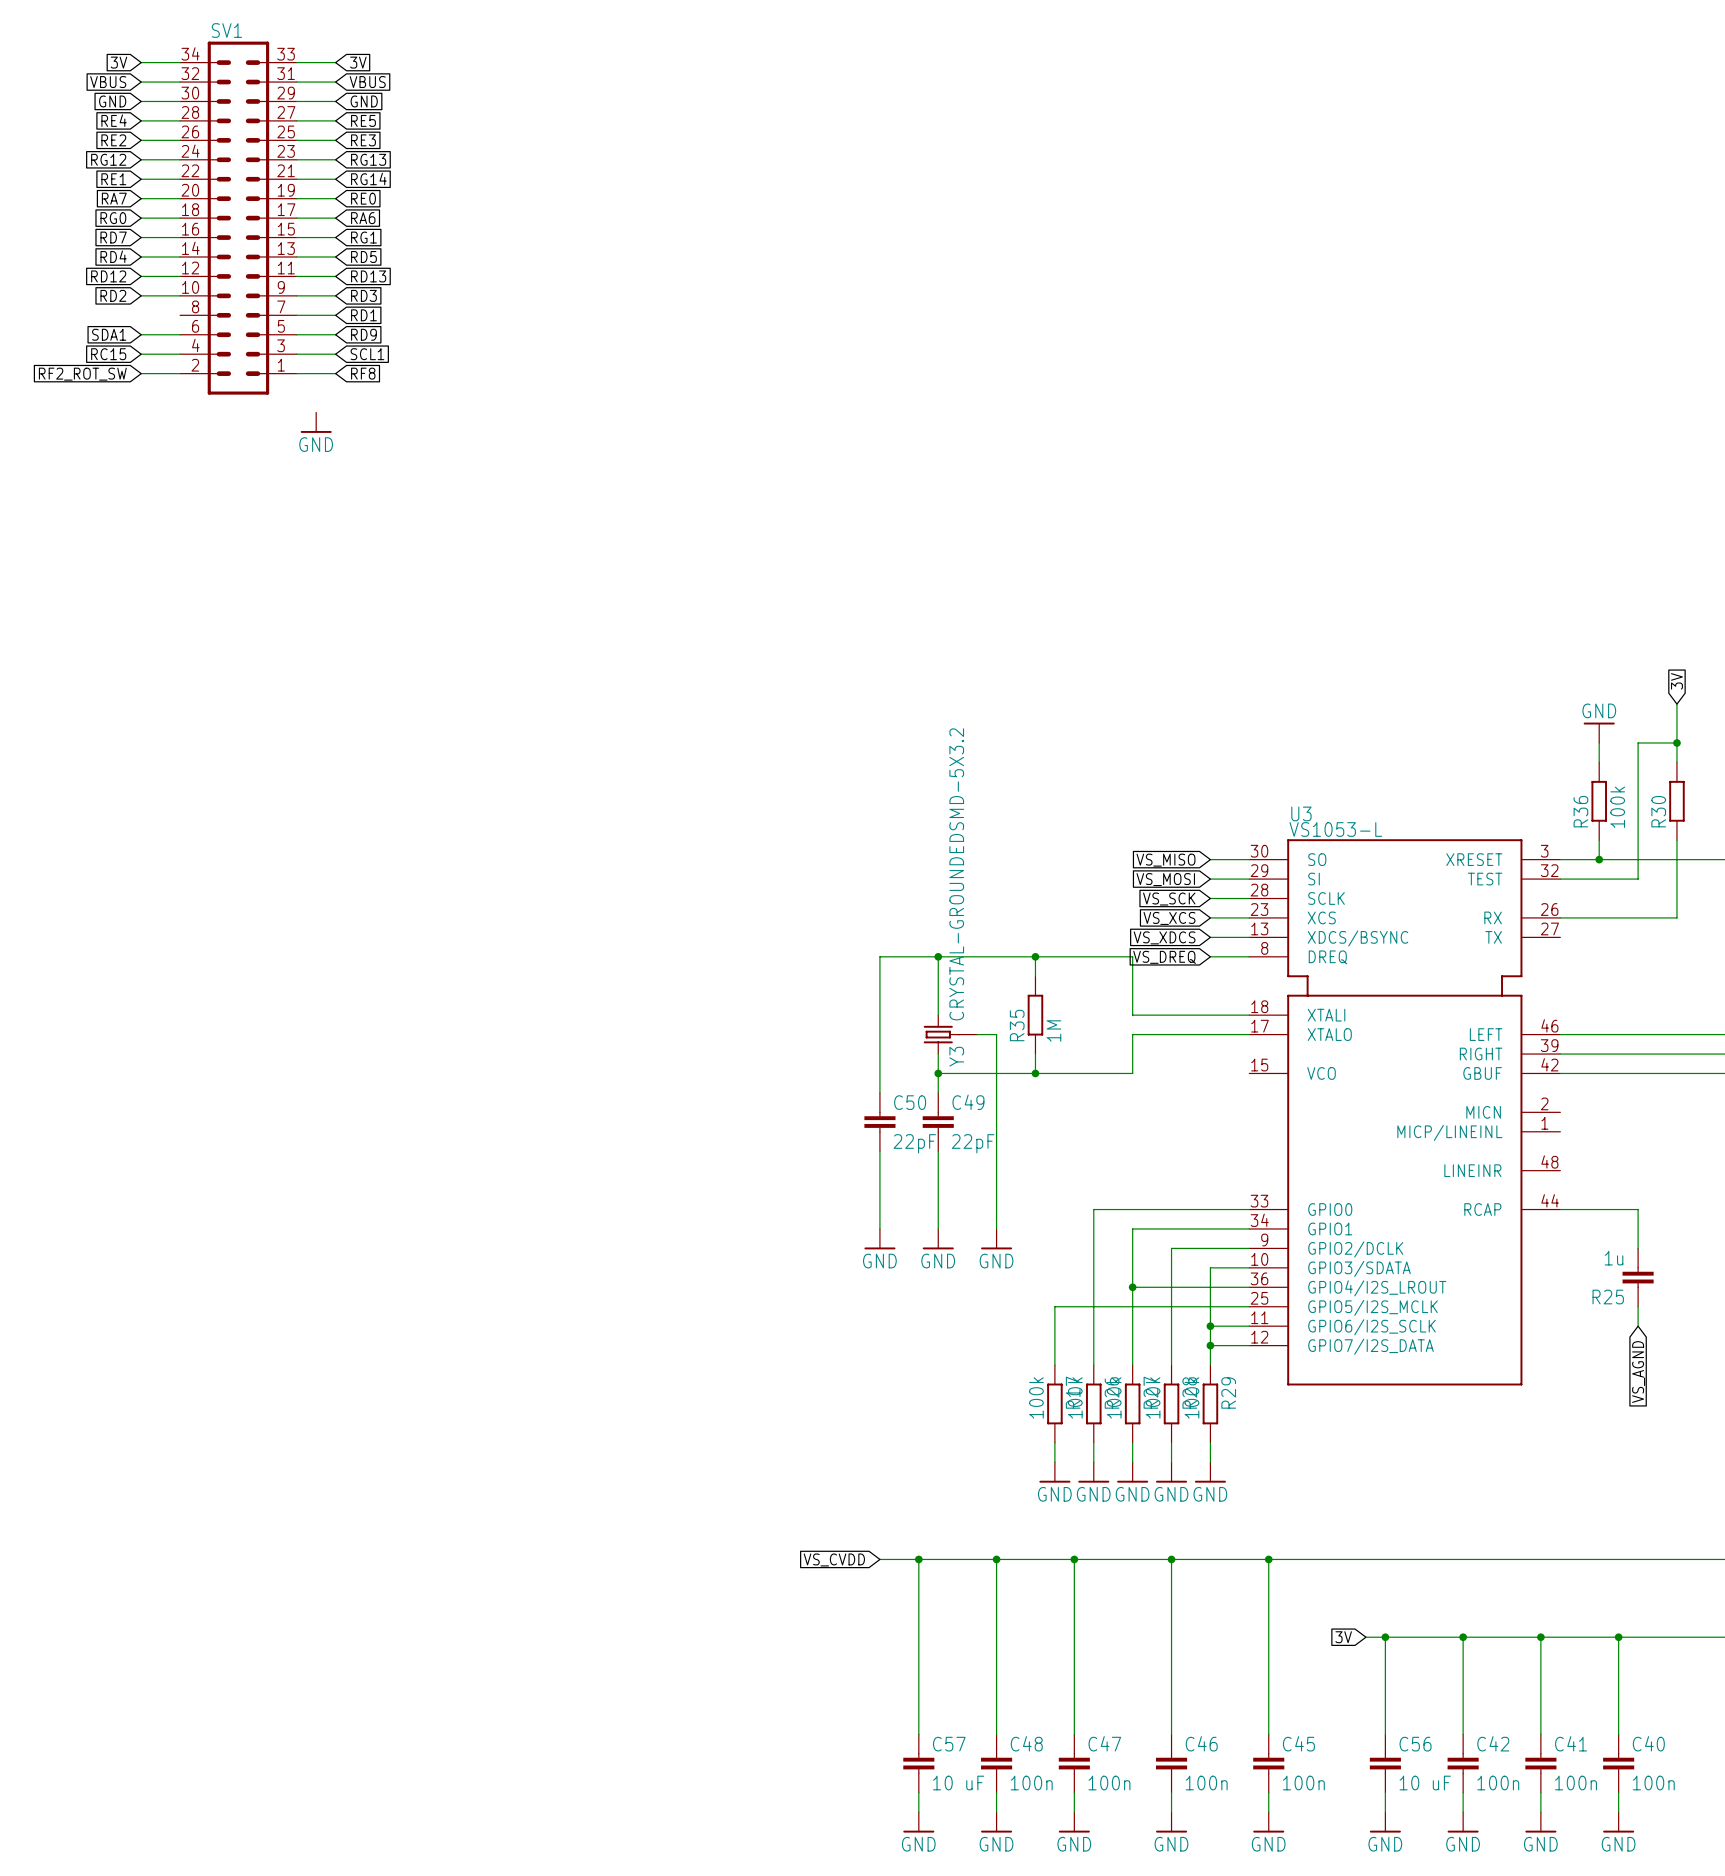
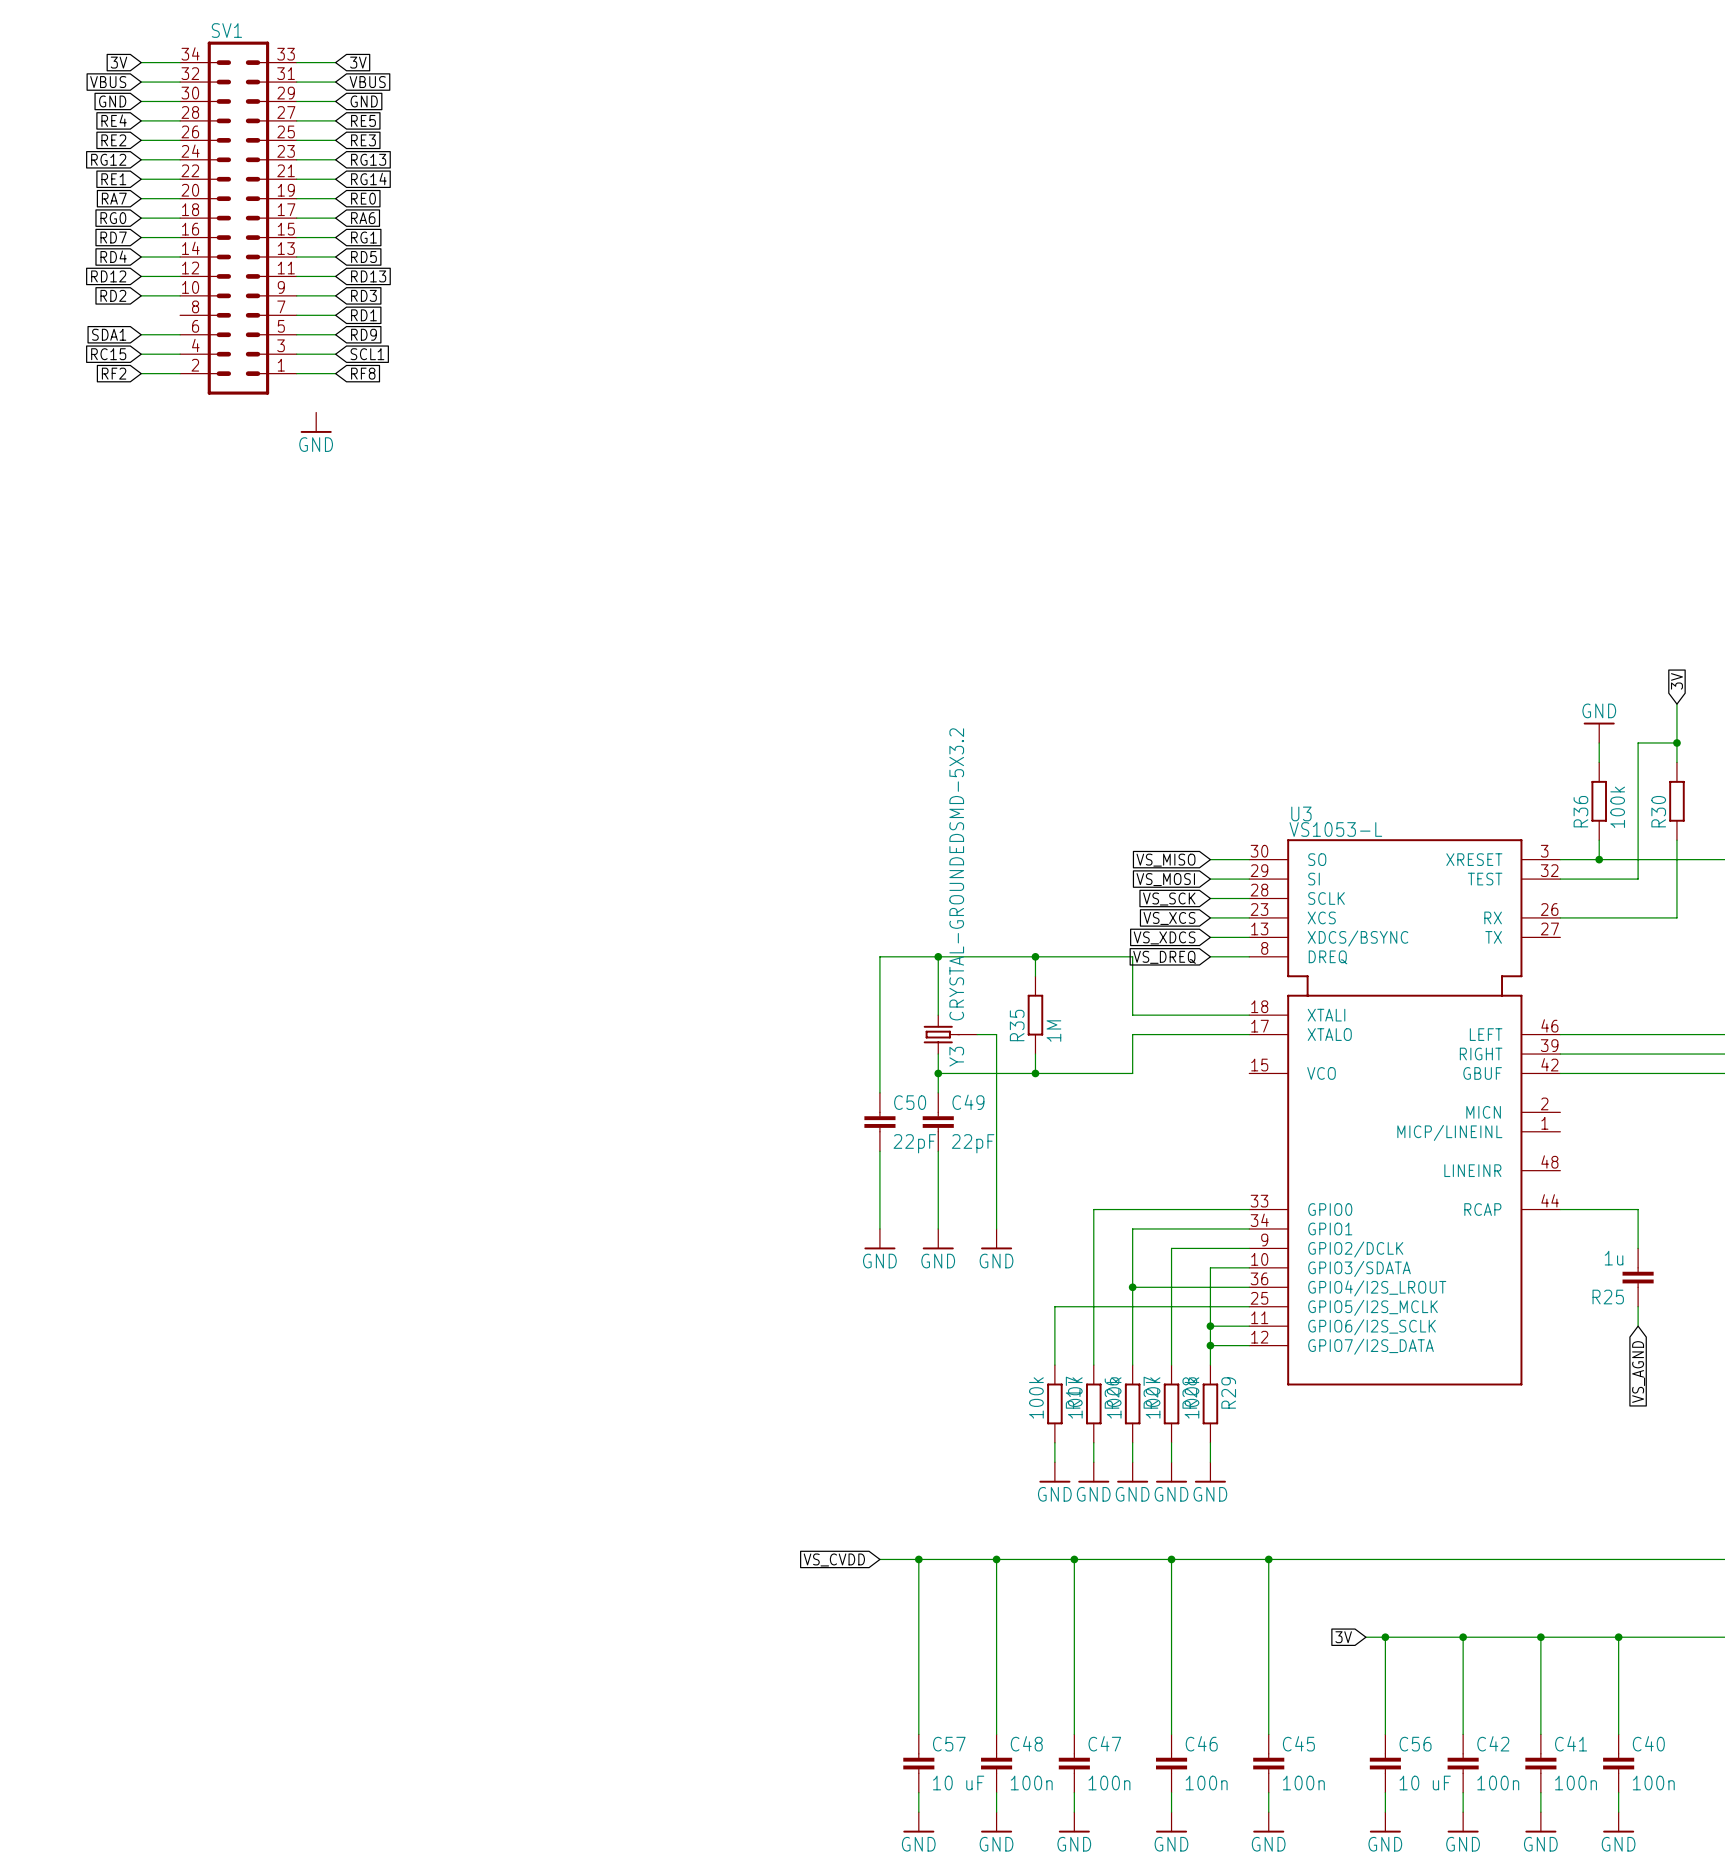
global label: RF2_ROT_SW (82, 374) -> RF2 (114, 373)

